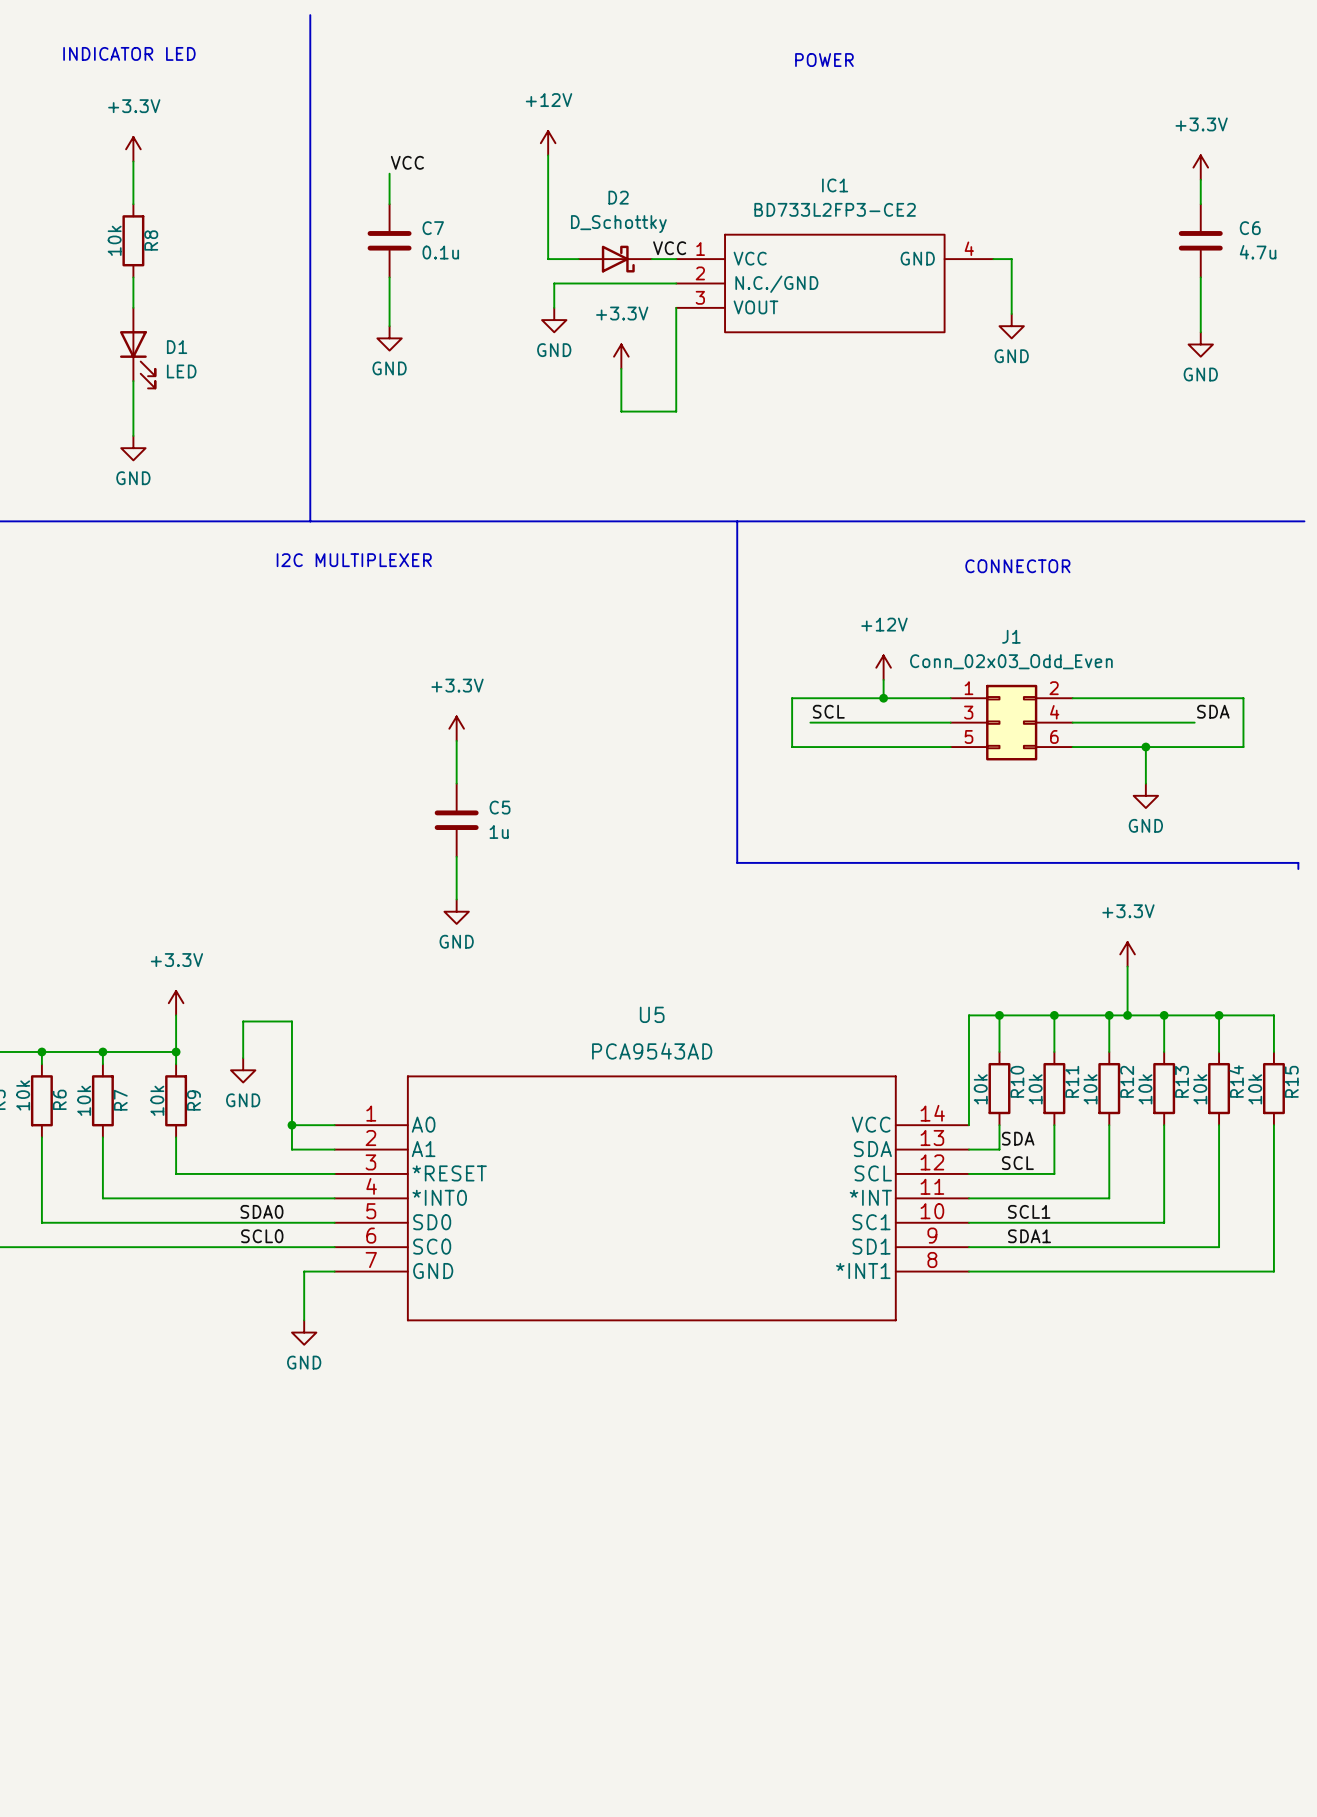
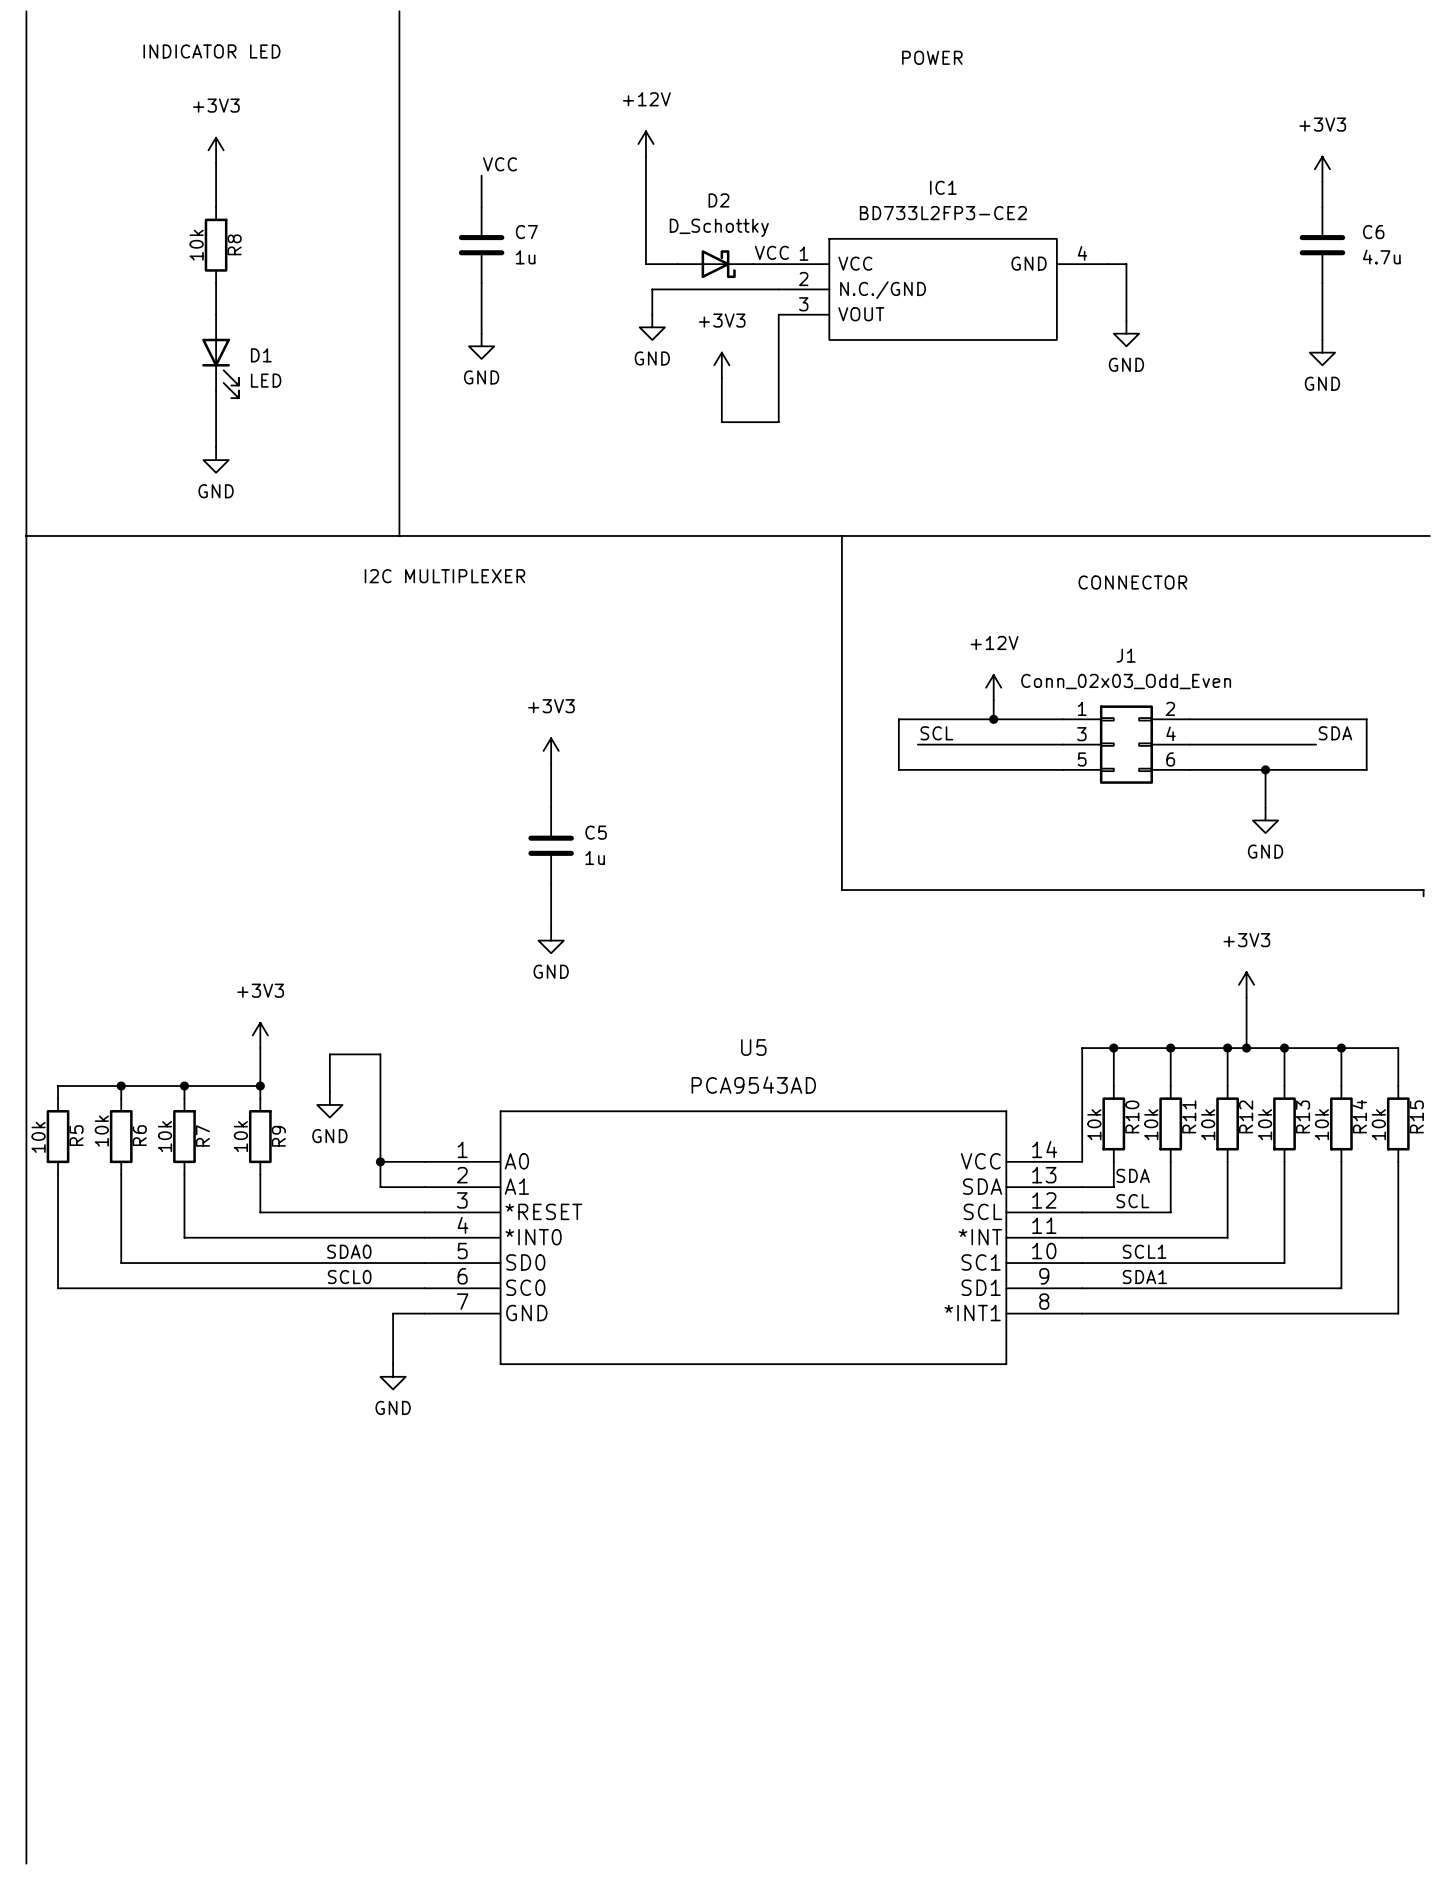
power symbol: +3.3V (133, 149) -> +3V3 (216, 150)
power symbol: +3.3V (1200, 167) -> +3V3 (1322, 169)
C7 value: 0.1u (440, 252) -> 1u (525, 257)
power symbol: +3.3V (621, 356) -> +3V3 (721, 365)
power symbol: +3.3V (456, 728) -> +3V3 (551, 750)
power symbol: +3.3V (1127, 954) -> +3V3 (1246, 984)
power symbol: +3.3V (176, 1003) -> +3V3 (260, 1035)

